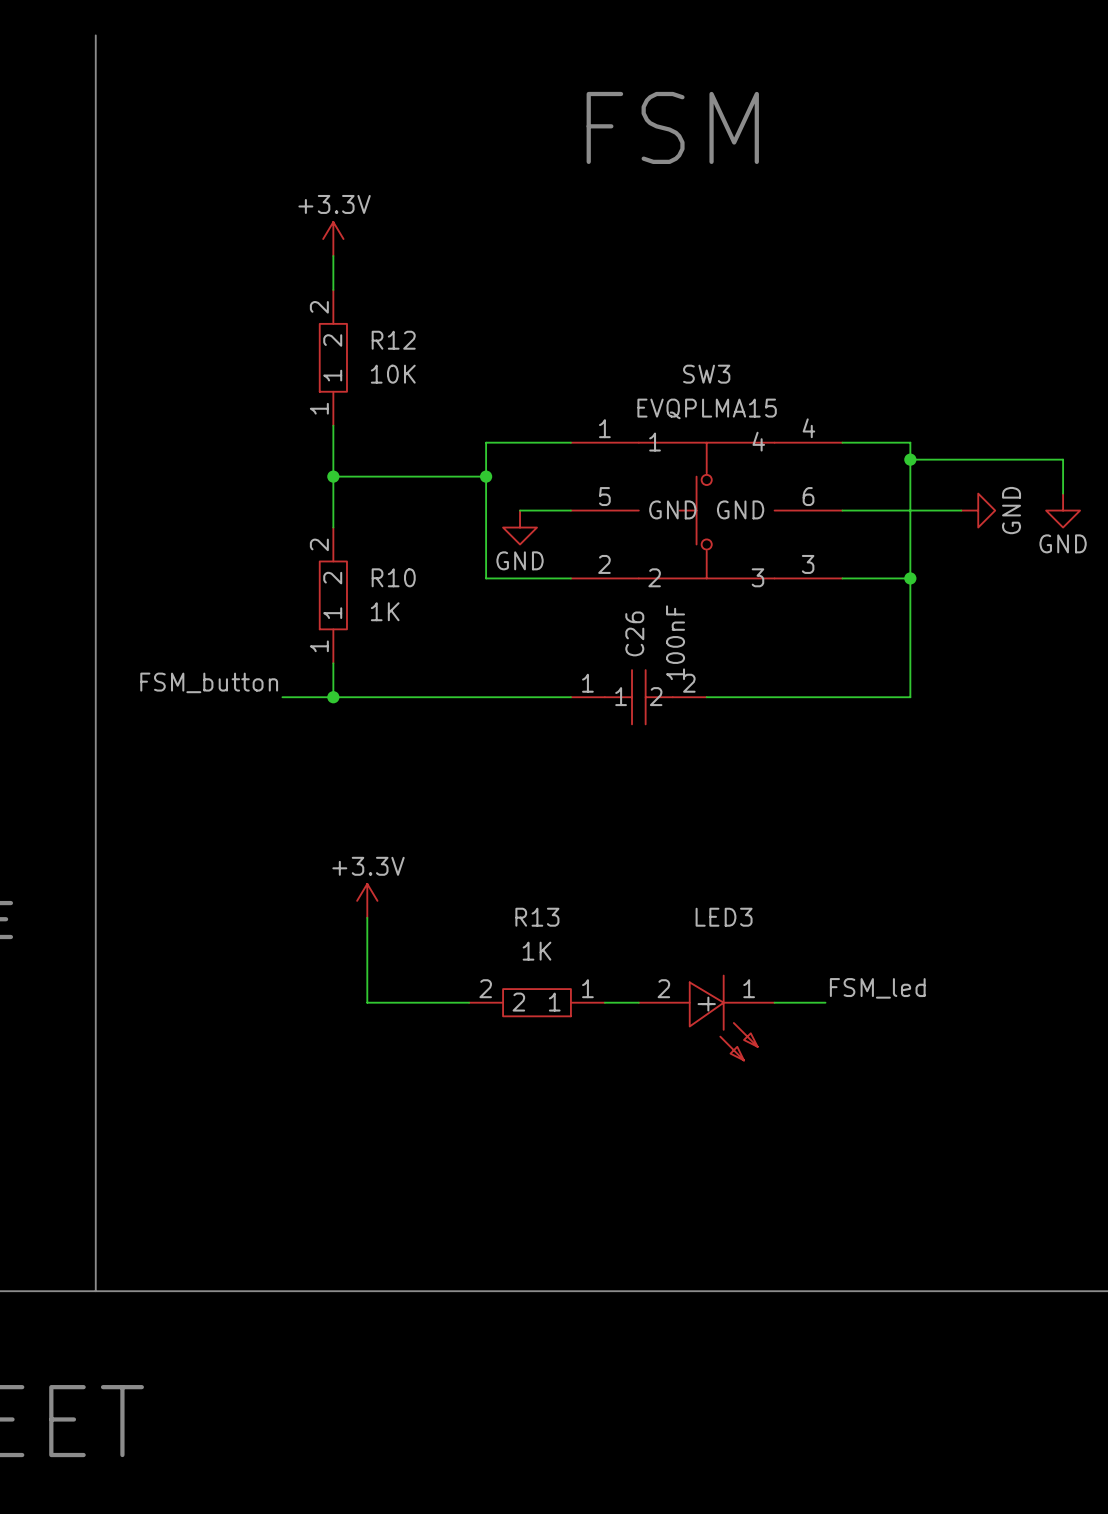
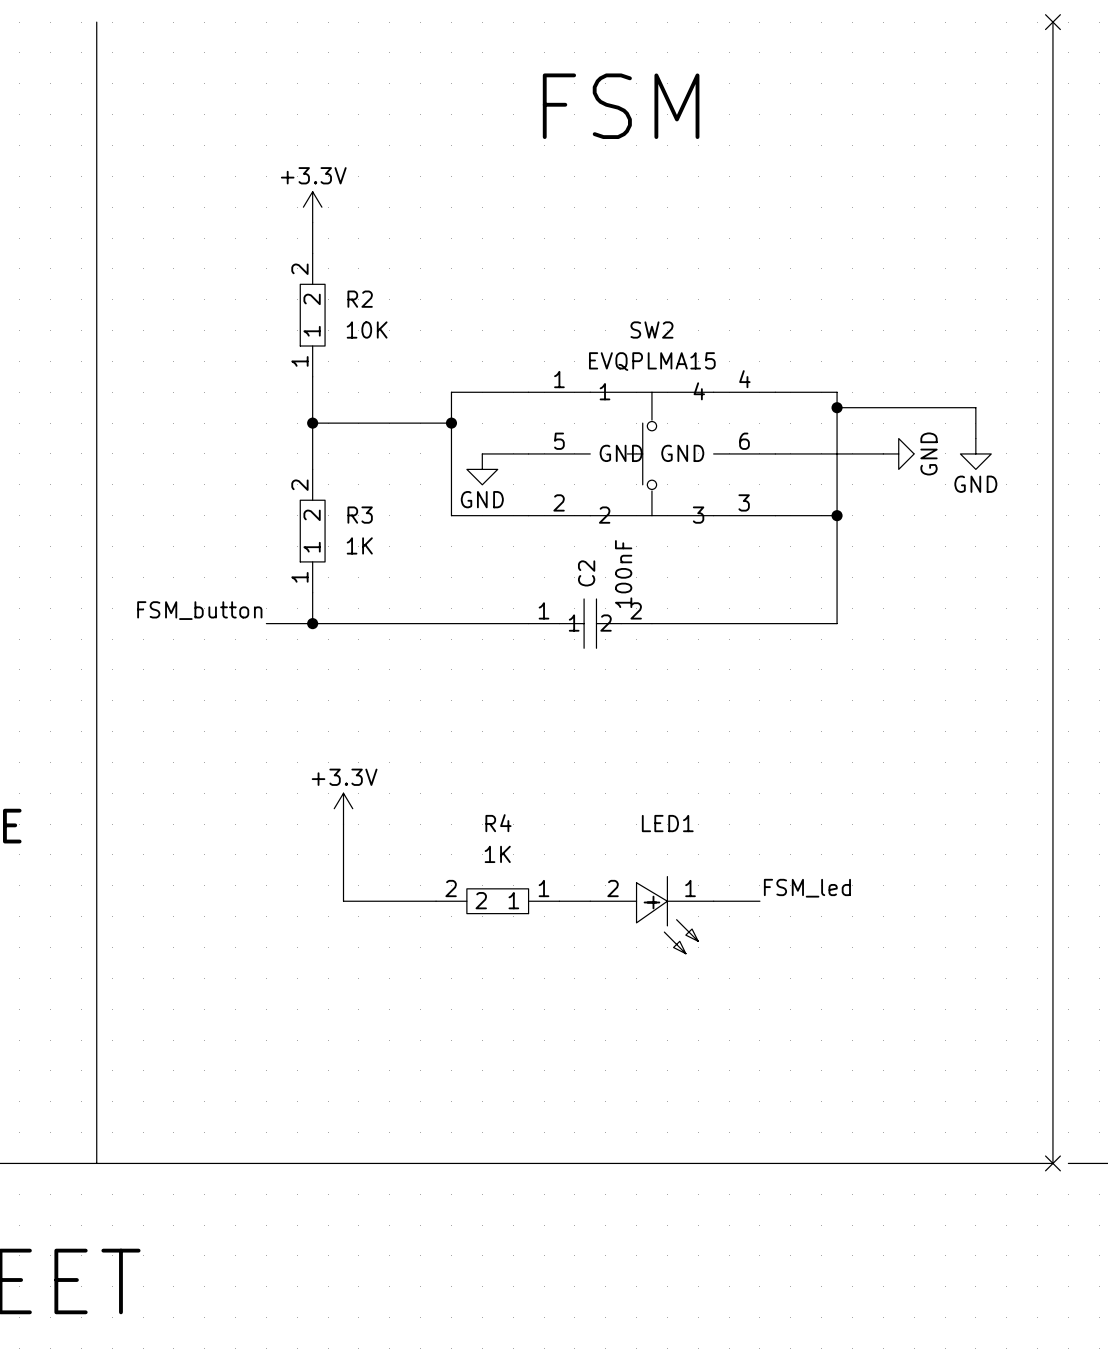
R12 name: R12 (393, 340) -> R2 (360, 299)
SW3 name: SW3 (706, 374) -> SW2 (651, 330)
R10 name: R10 (393, 577) -> R3 (360, 515)
C26 name: C26 (634, 633) -> C2 (586, 573)
R13 name: R13 (537, 917) -> R4 (498, 823)
LED3 name: LED3 (724, 917) -> LED1 (667, 823)

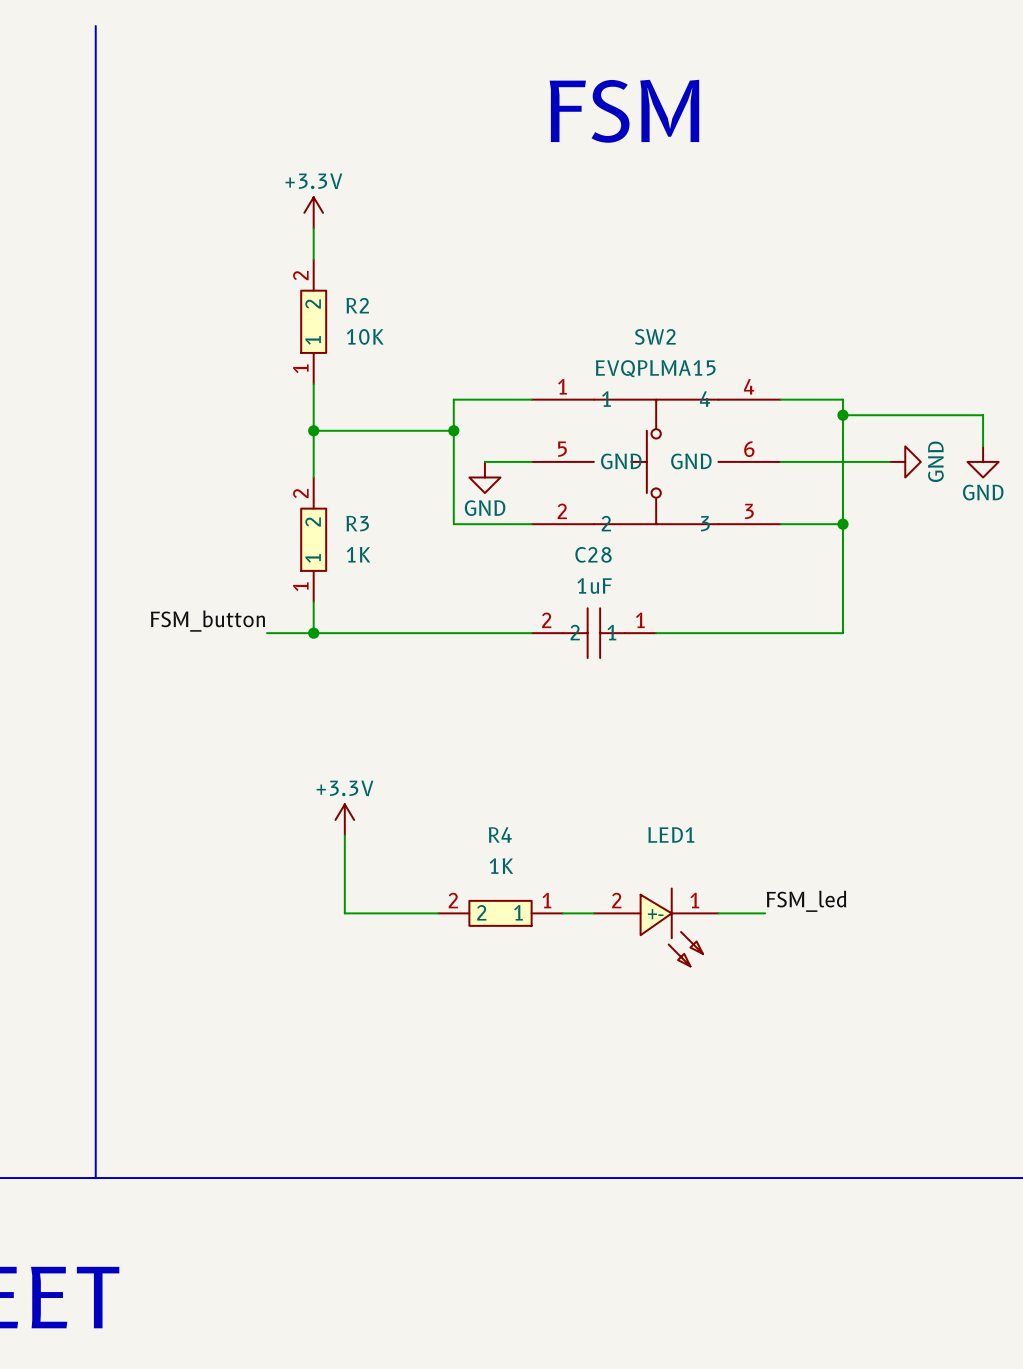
C2 name: C2 (586, 573) -> C28 (593, 554)
C2 value: 100nF (623, 574) -> 1uF (594, 585)
C2 rotation: 0° (590, 623) -> 180° (593, 633)

